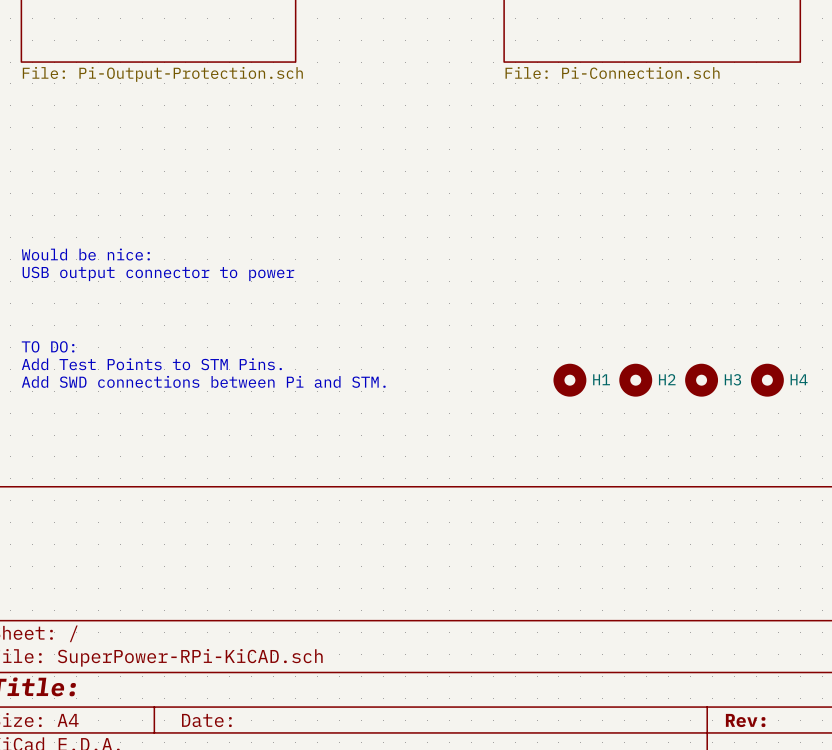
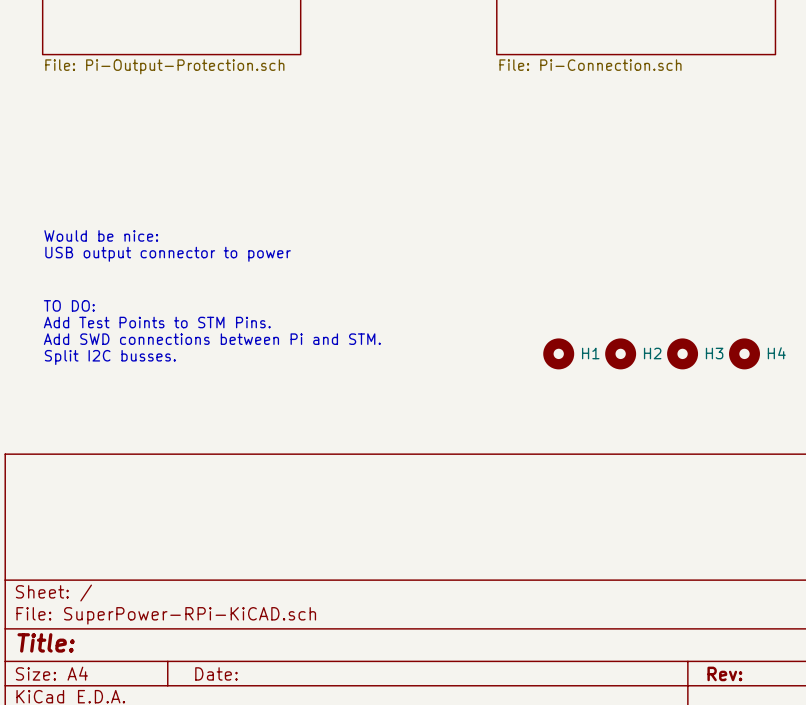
text: none -> TO DO: (69, 305)
text: TO DO: (48, 346) -> Add Test Points to STM Pins. (157, 322)
text: Add Test Points to STM Pins. (151, 364) -> Add SWD connections between Pi and STM. (212, 339)
text: Add SWD connections between Pi and STM. (203, 381) -> Split I2C busses. (110, 357)

